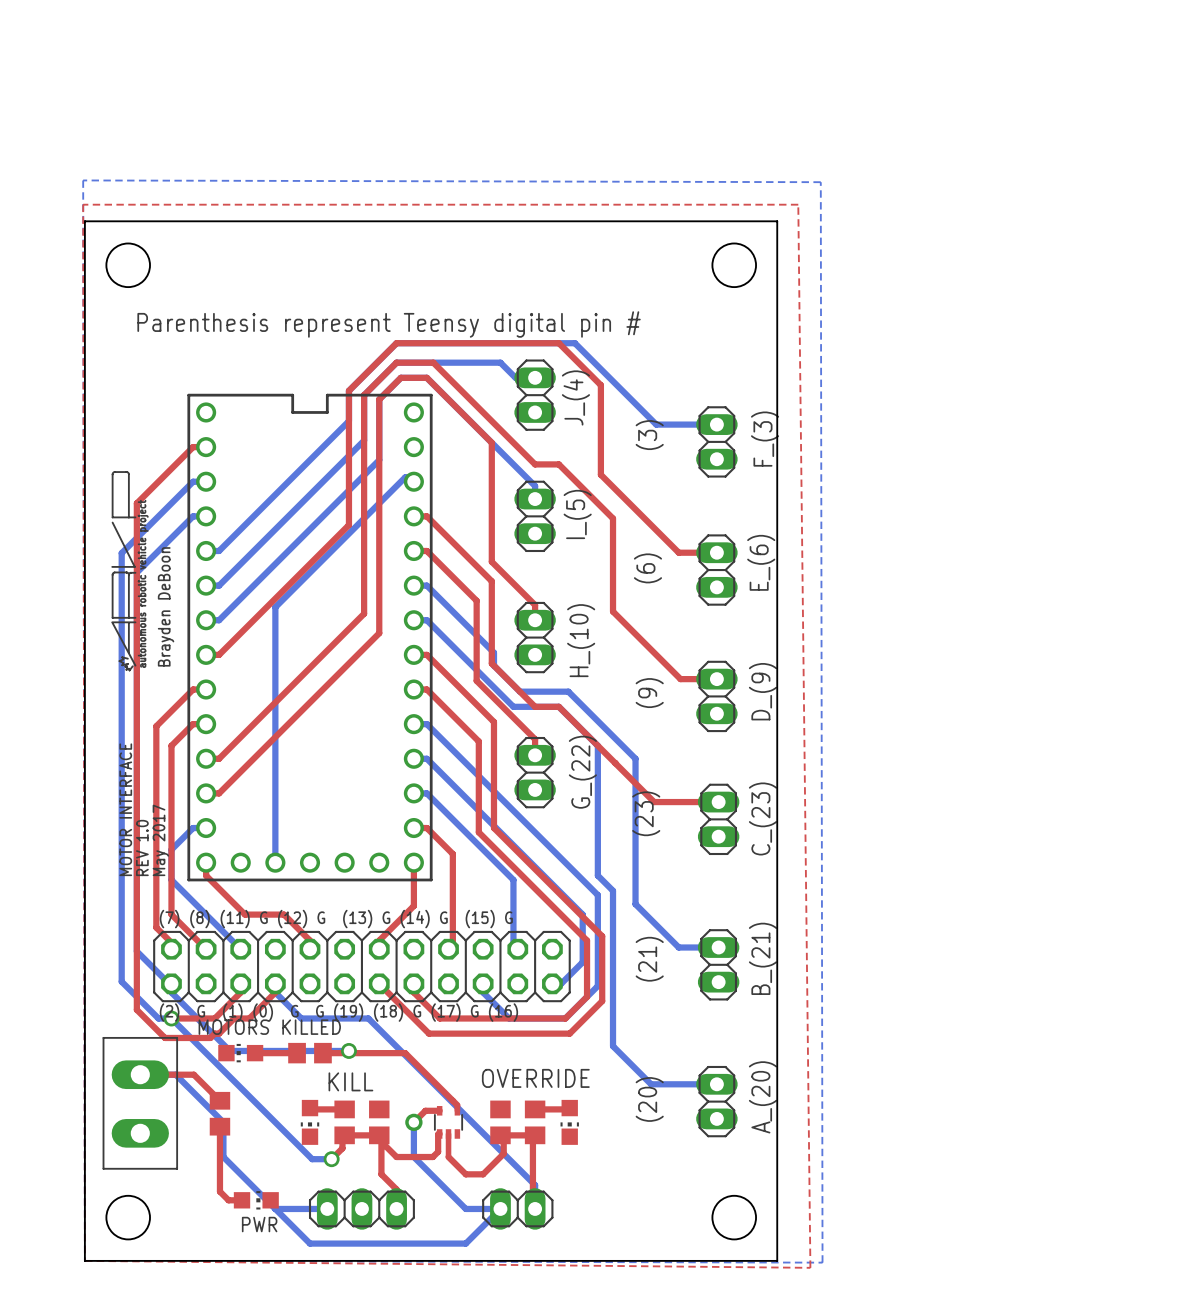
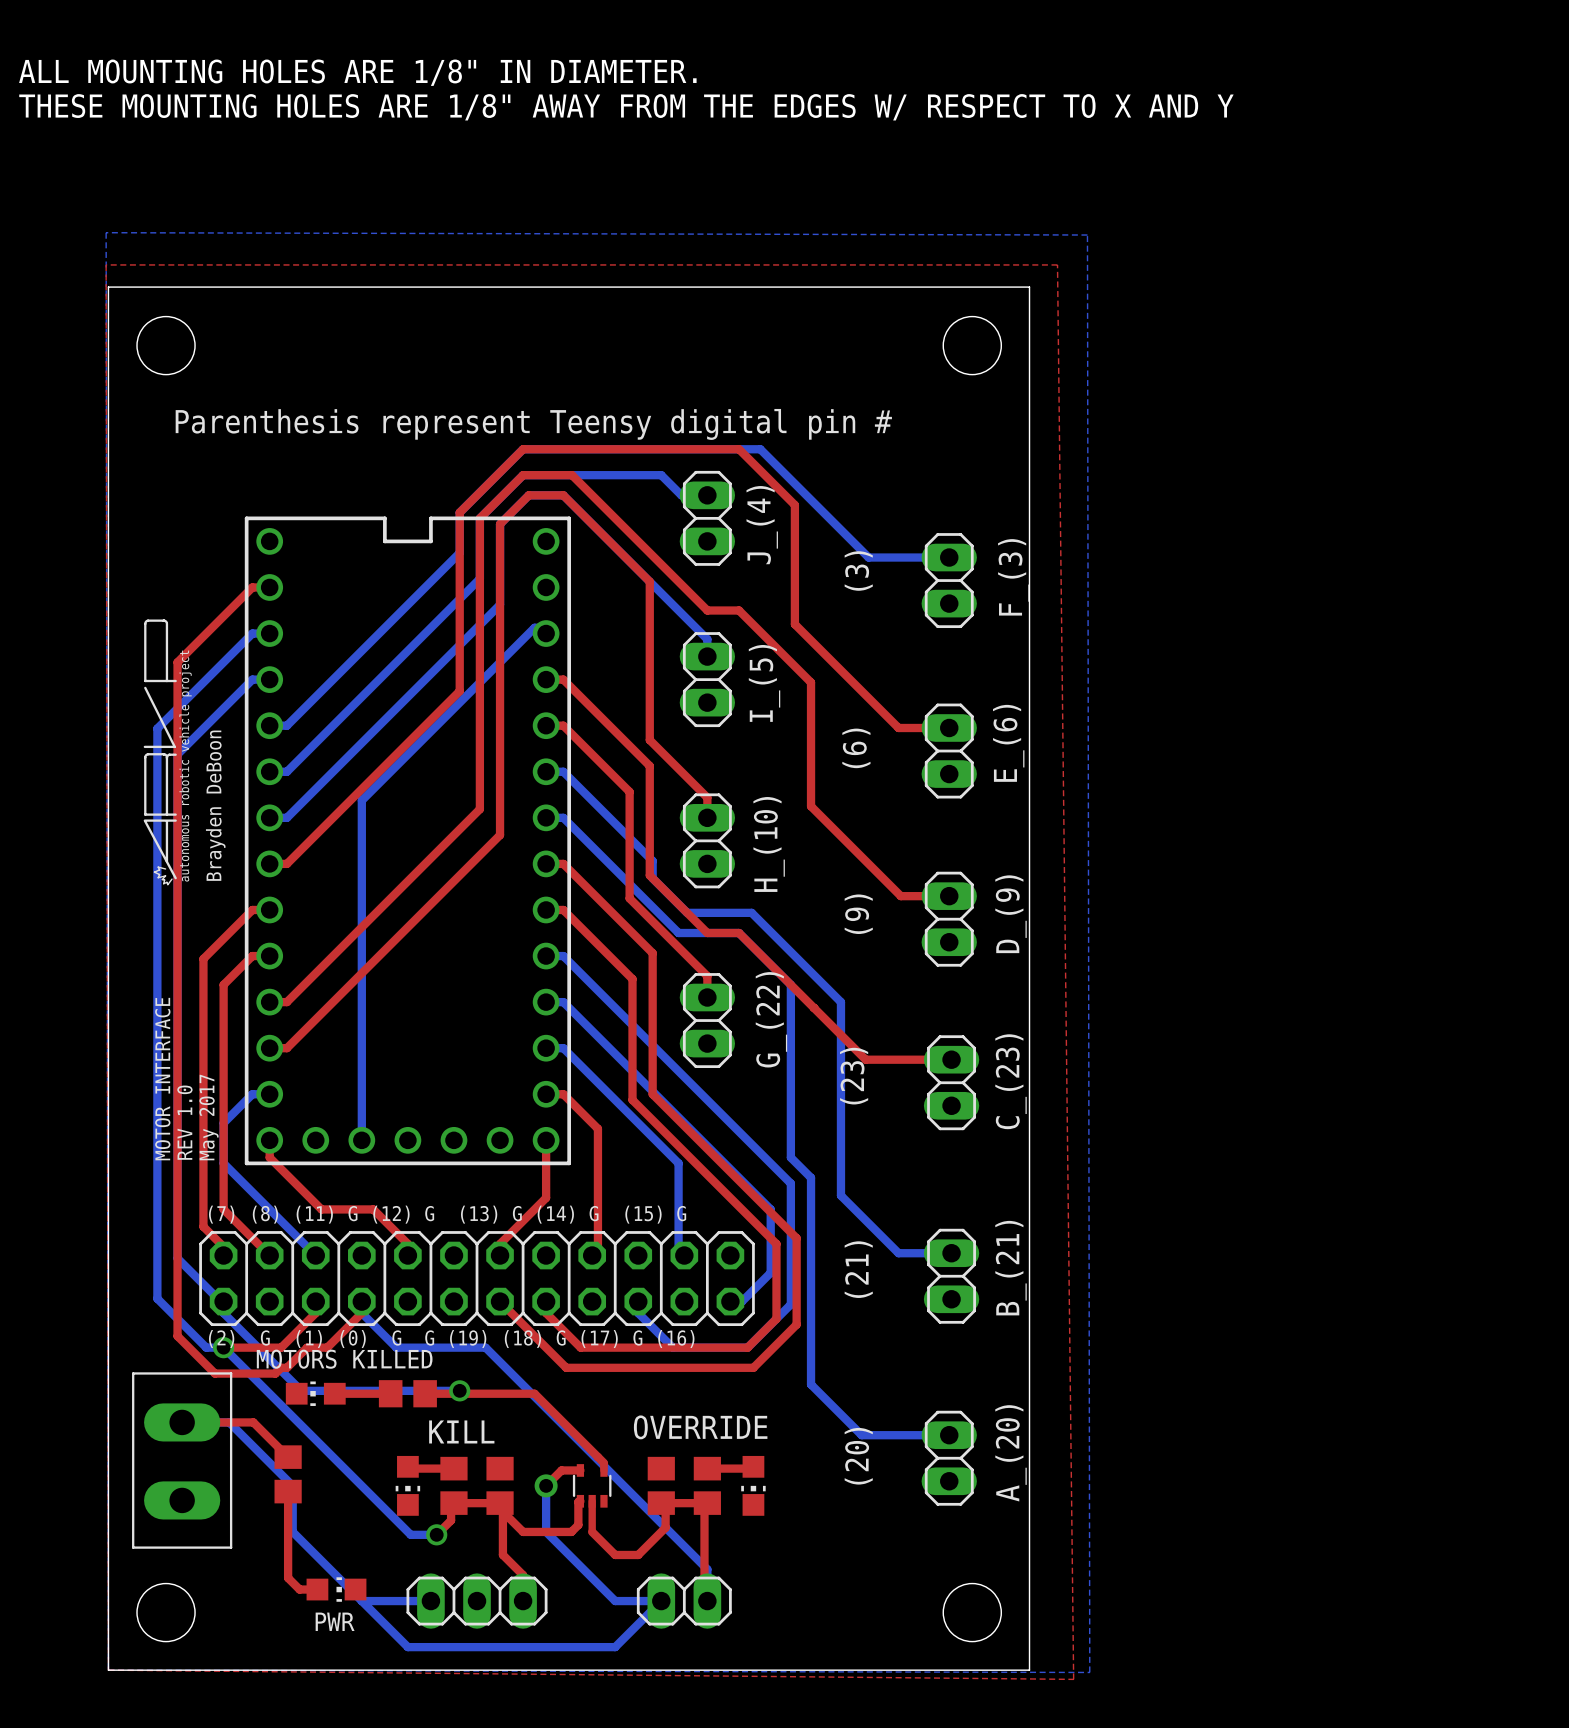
text: none -> ALL MOUNTING HOLES ARE 1/8" IN DIAMETER. (357, 72)
text: none -> THESE MOUNTING HOLES ARE 1/8" AWAY FROM THE EDGES W/ RESPECT TO X AND Y (626, 107)

